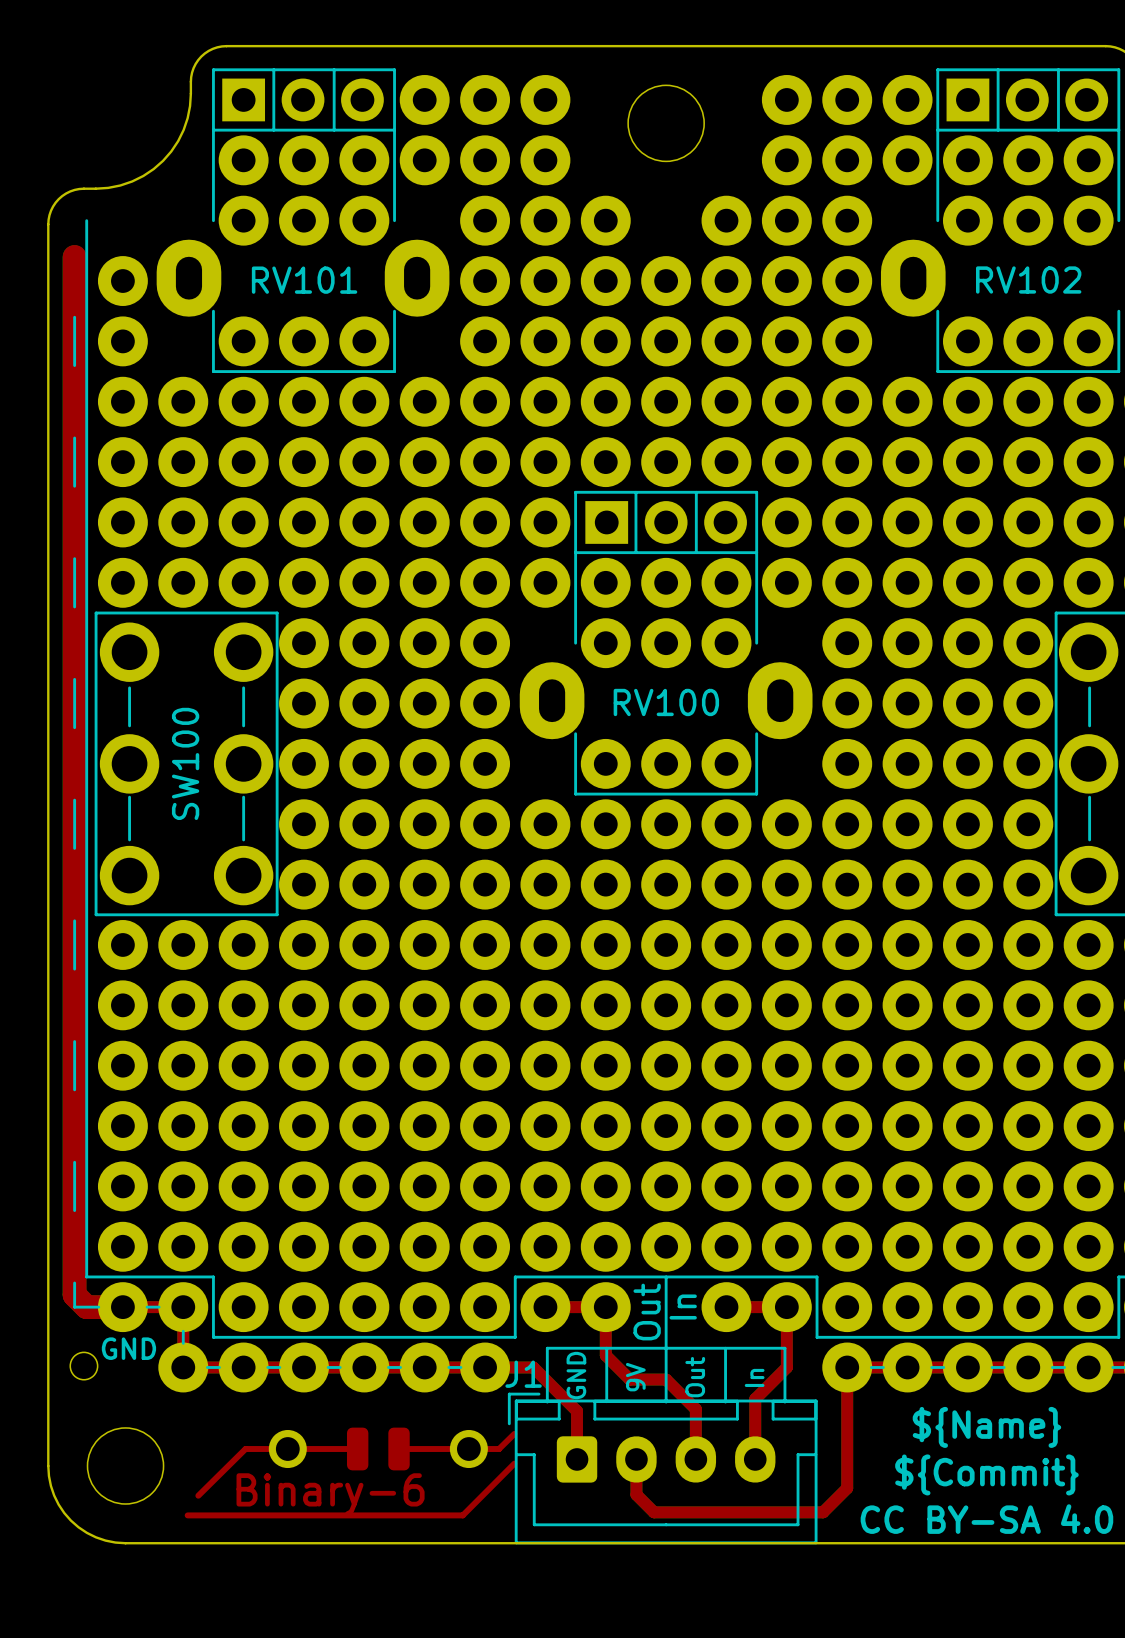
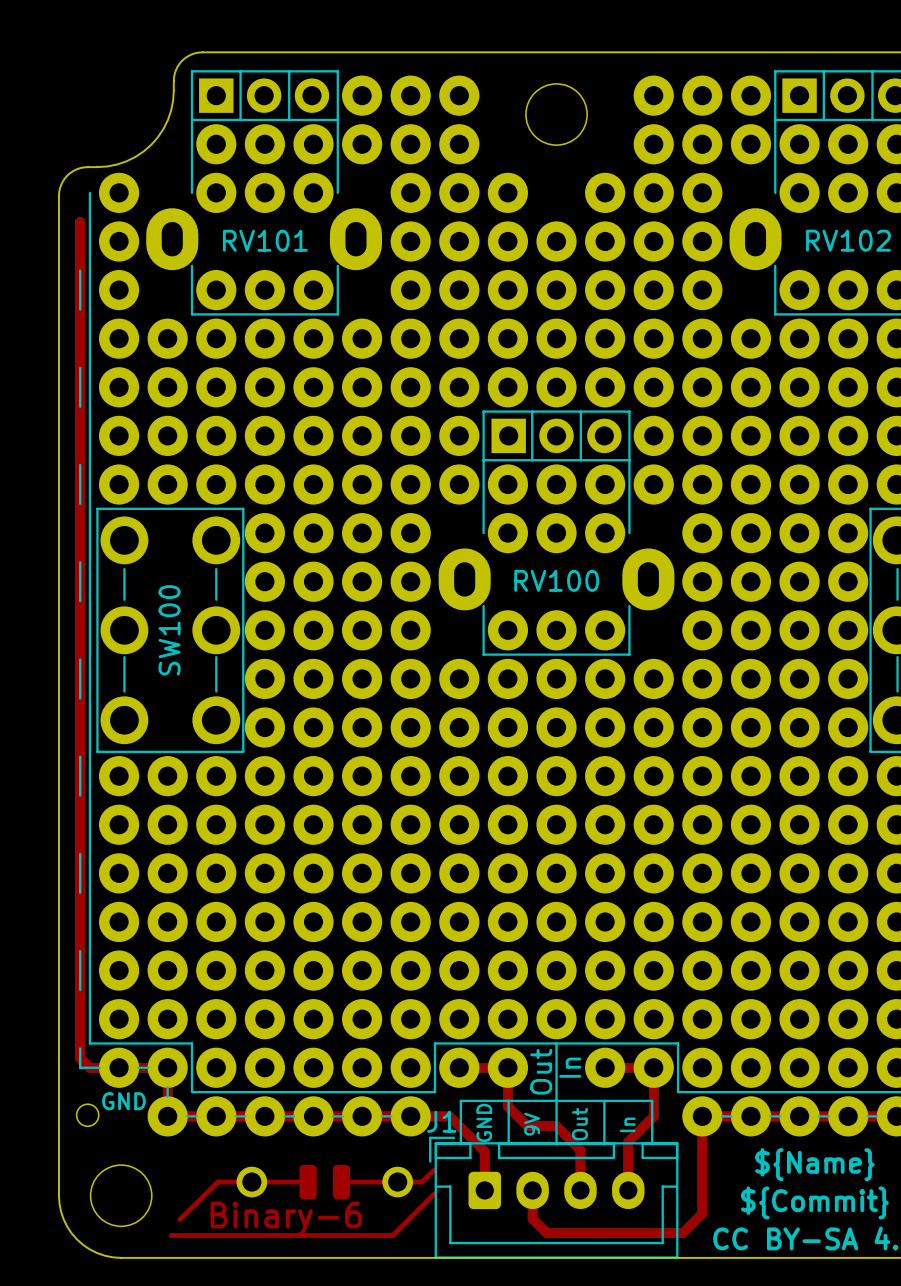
part: none -> (119, 192)
top track width: thick (74, 256) (74, 1295) (86, 1307) (122, 1307) -> thin (80, 222) (80, 1058) (89, 1067) (119, 1067)

